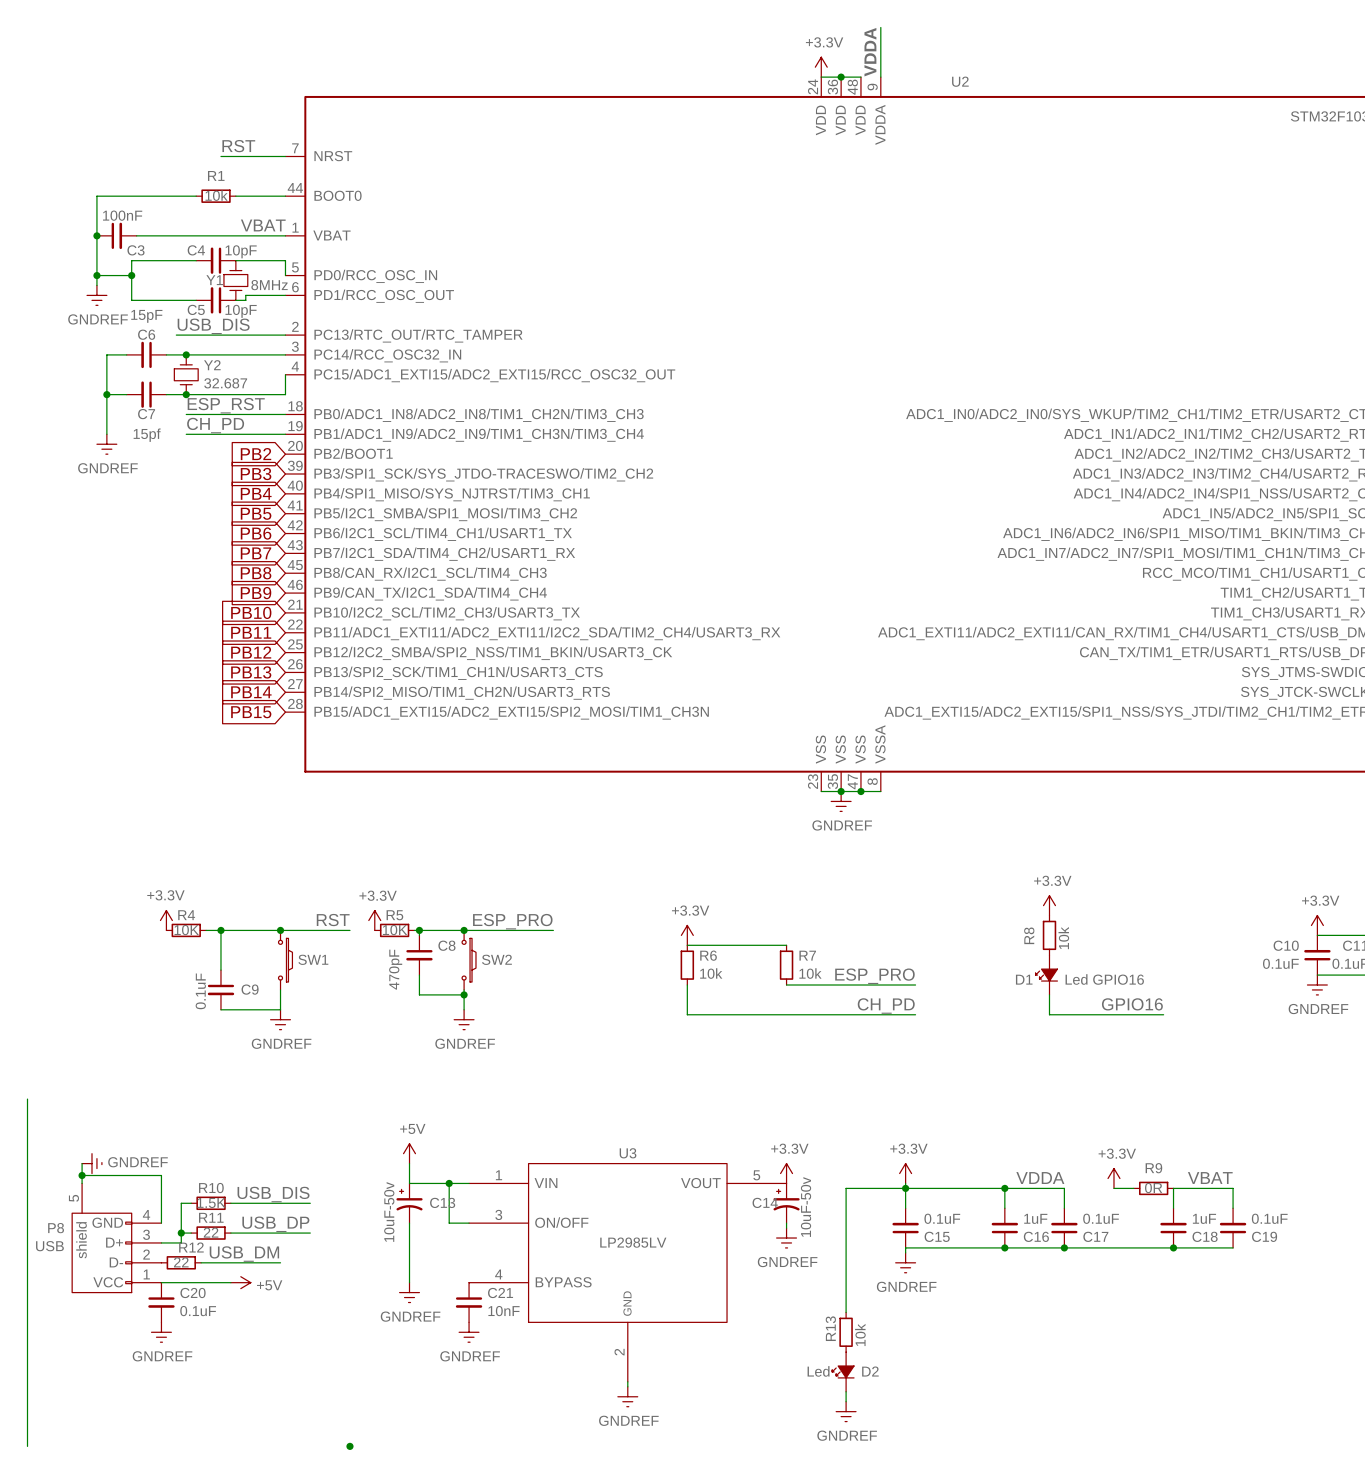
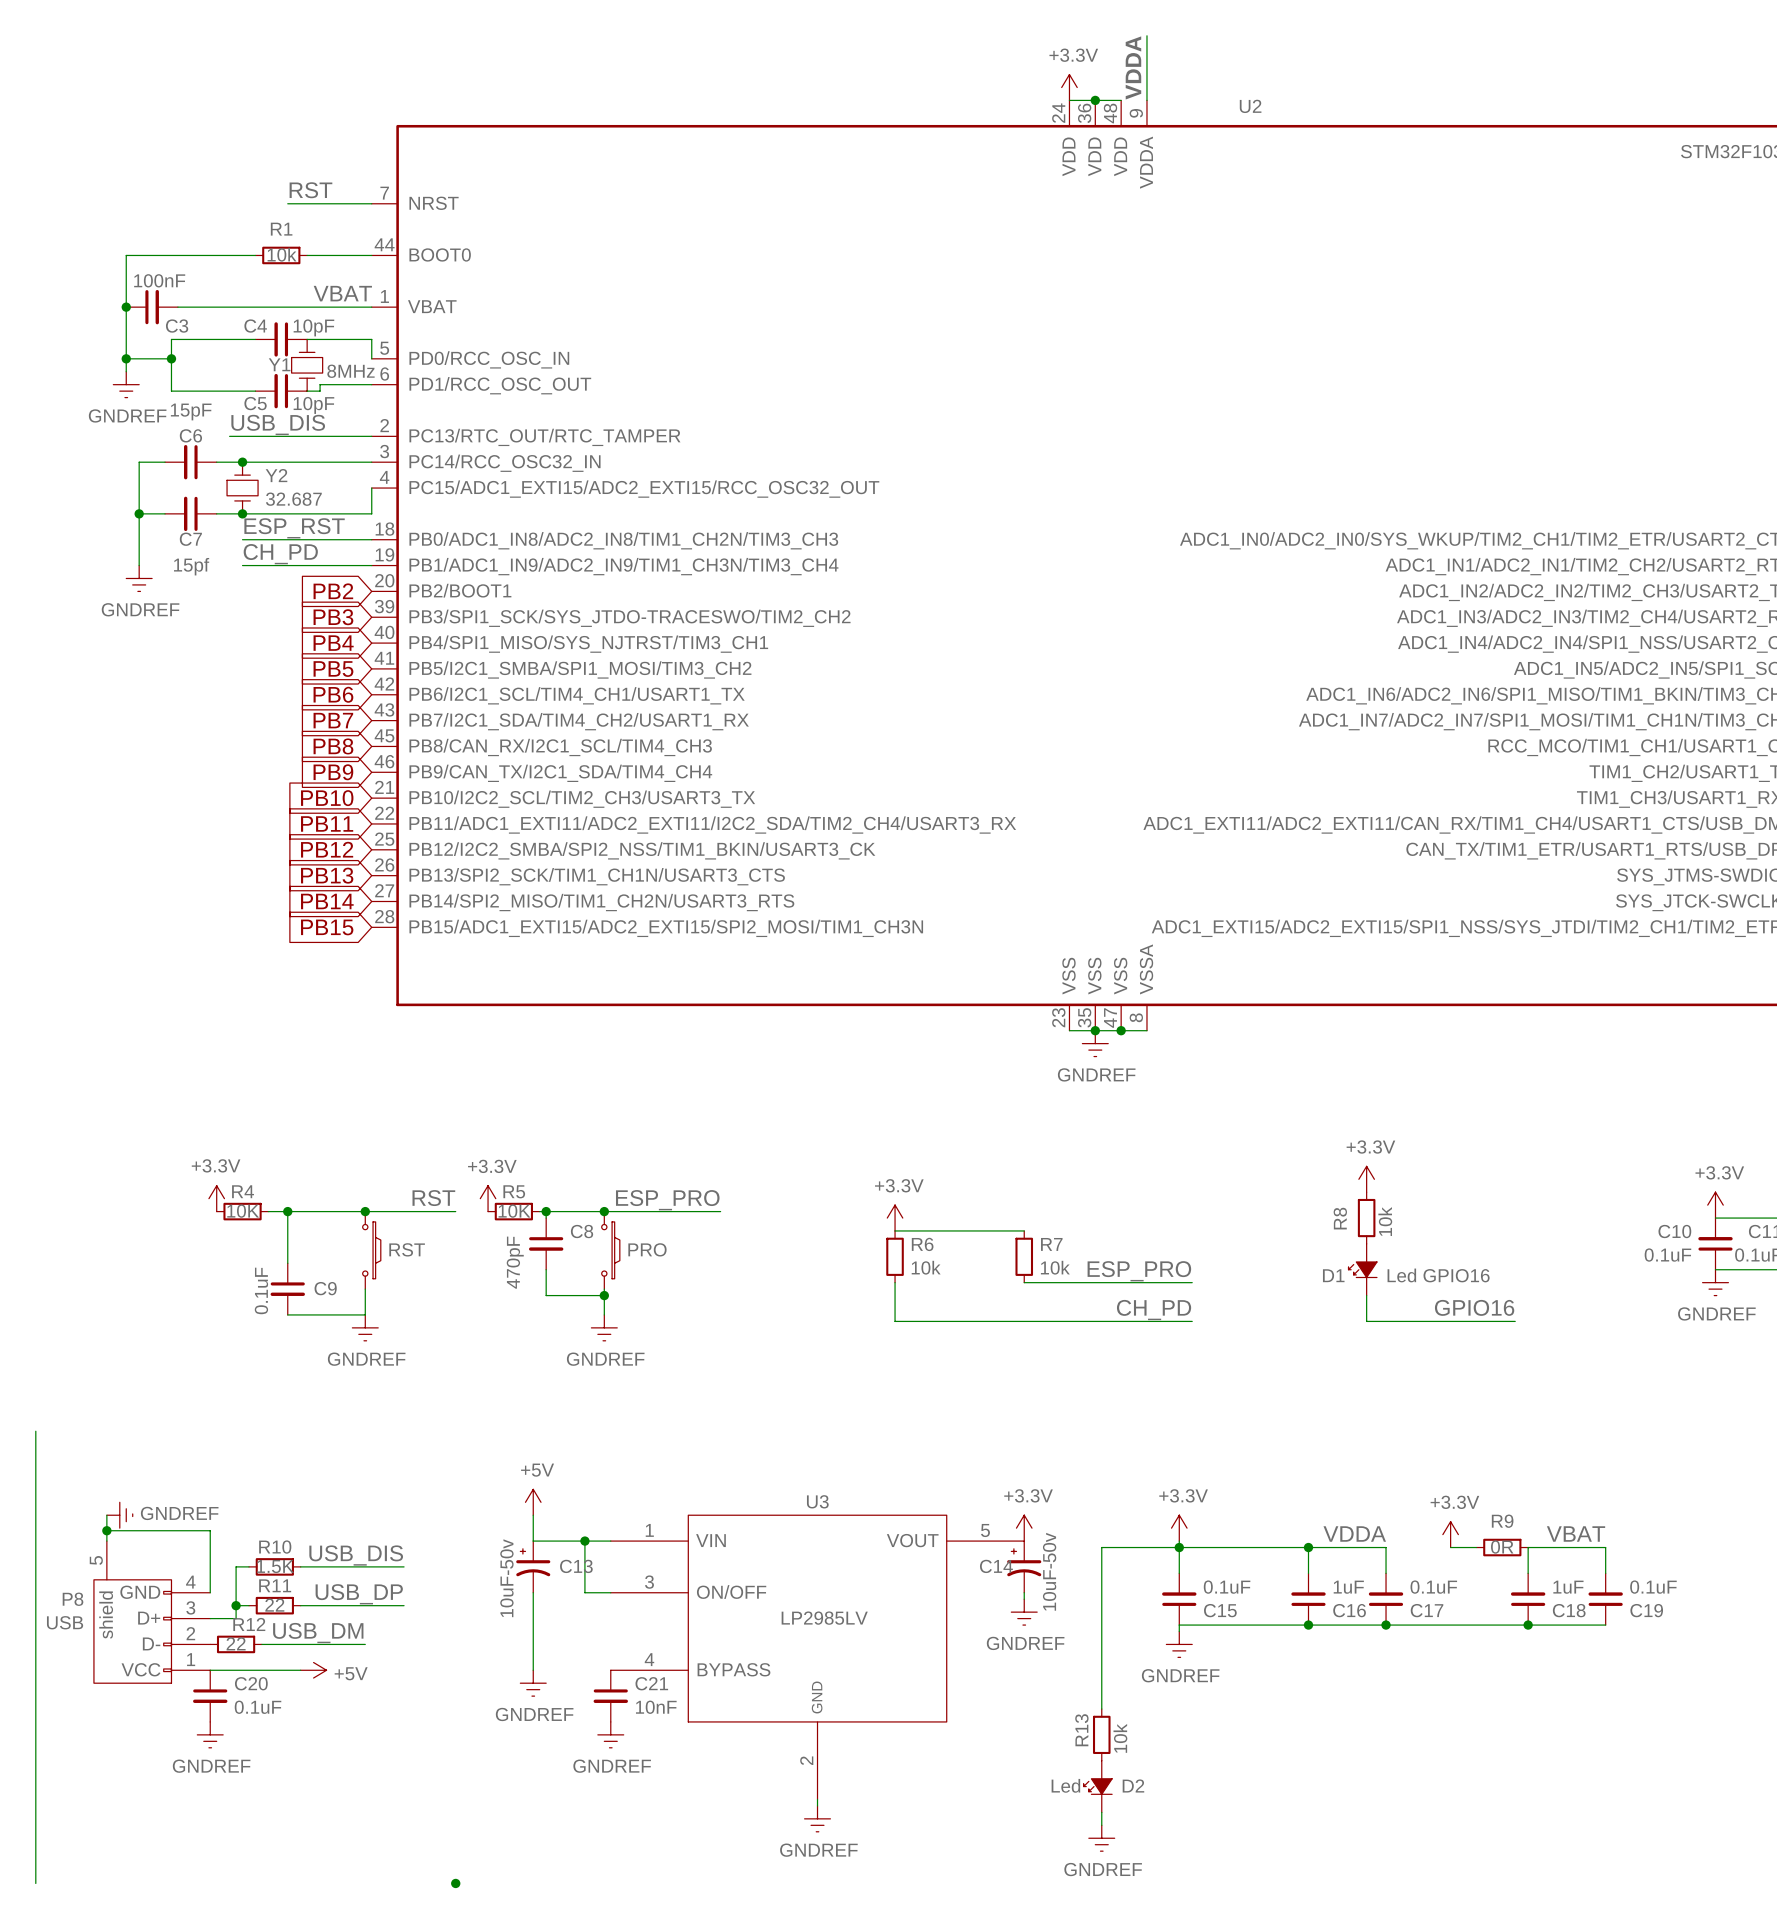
SW1 name: SW1 (313, 959) -> RST (407, 1249)
SW2 name: SW2 (496, 959) -> PRO (647, 1249)

